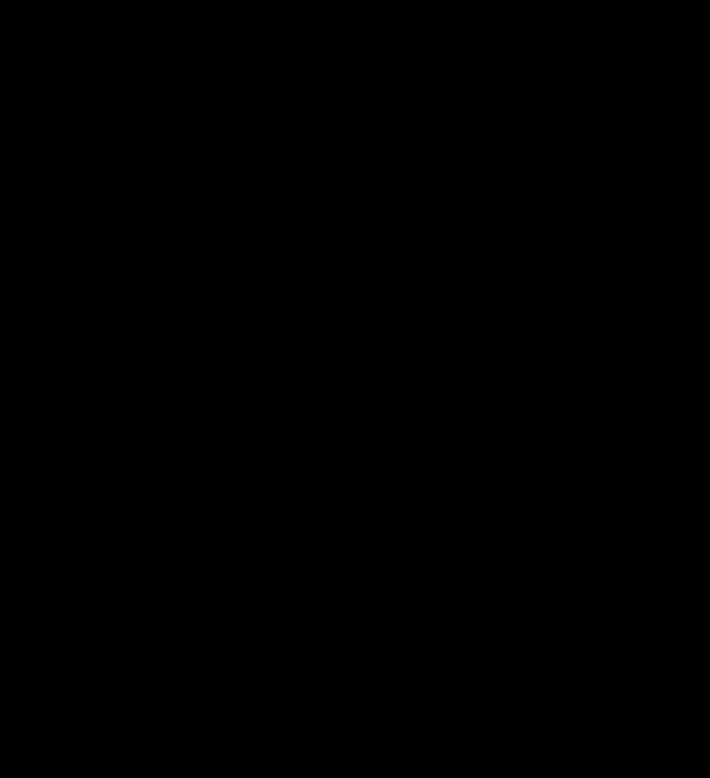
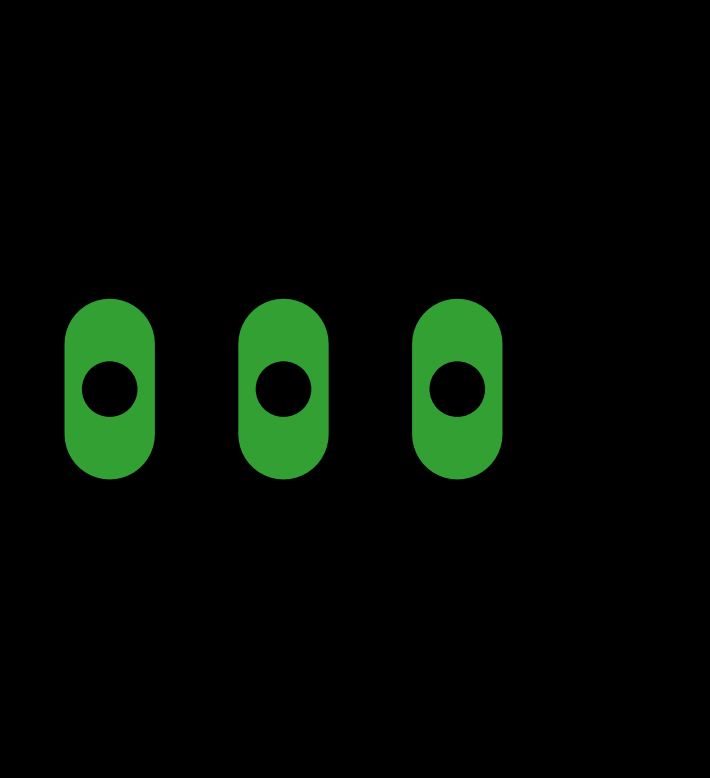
part: none -> (283, 389)

